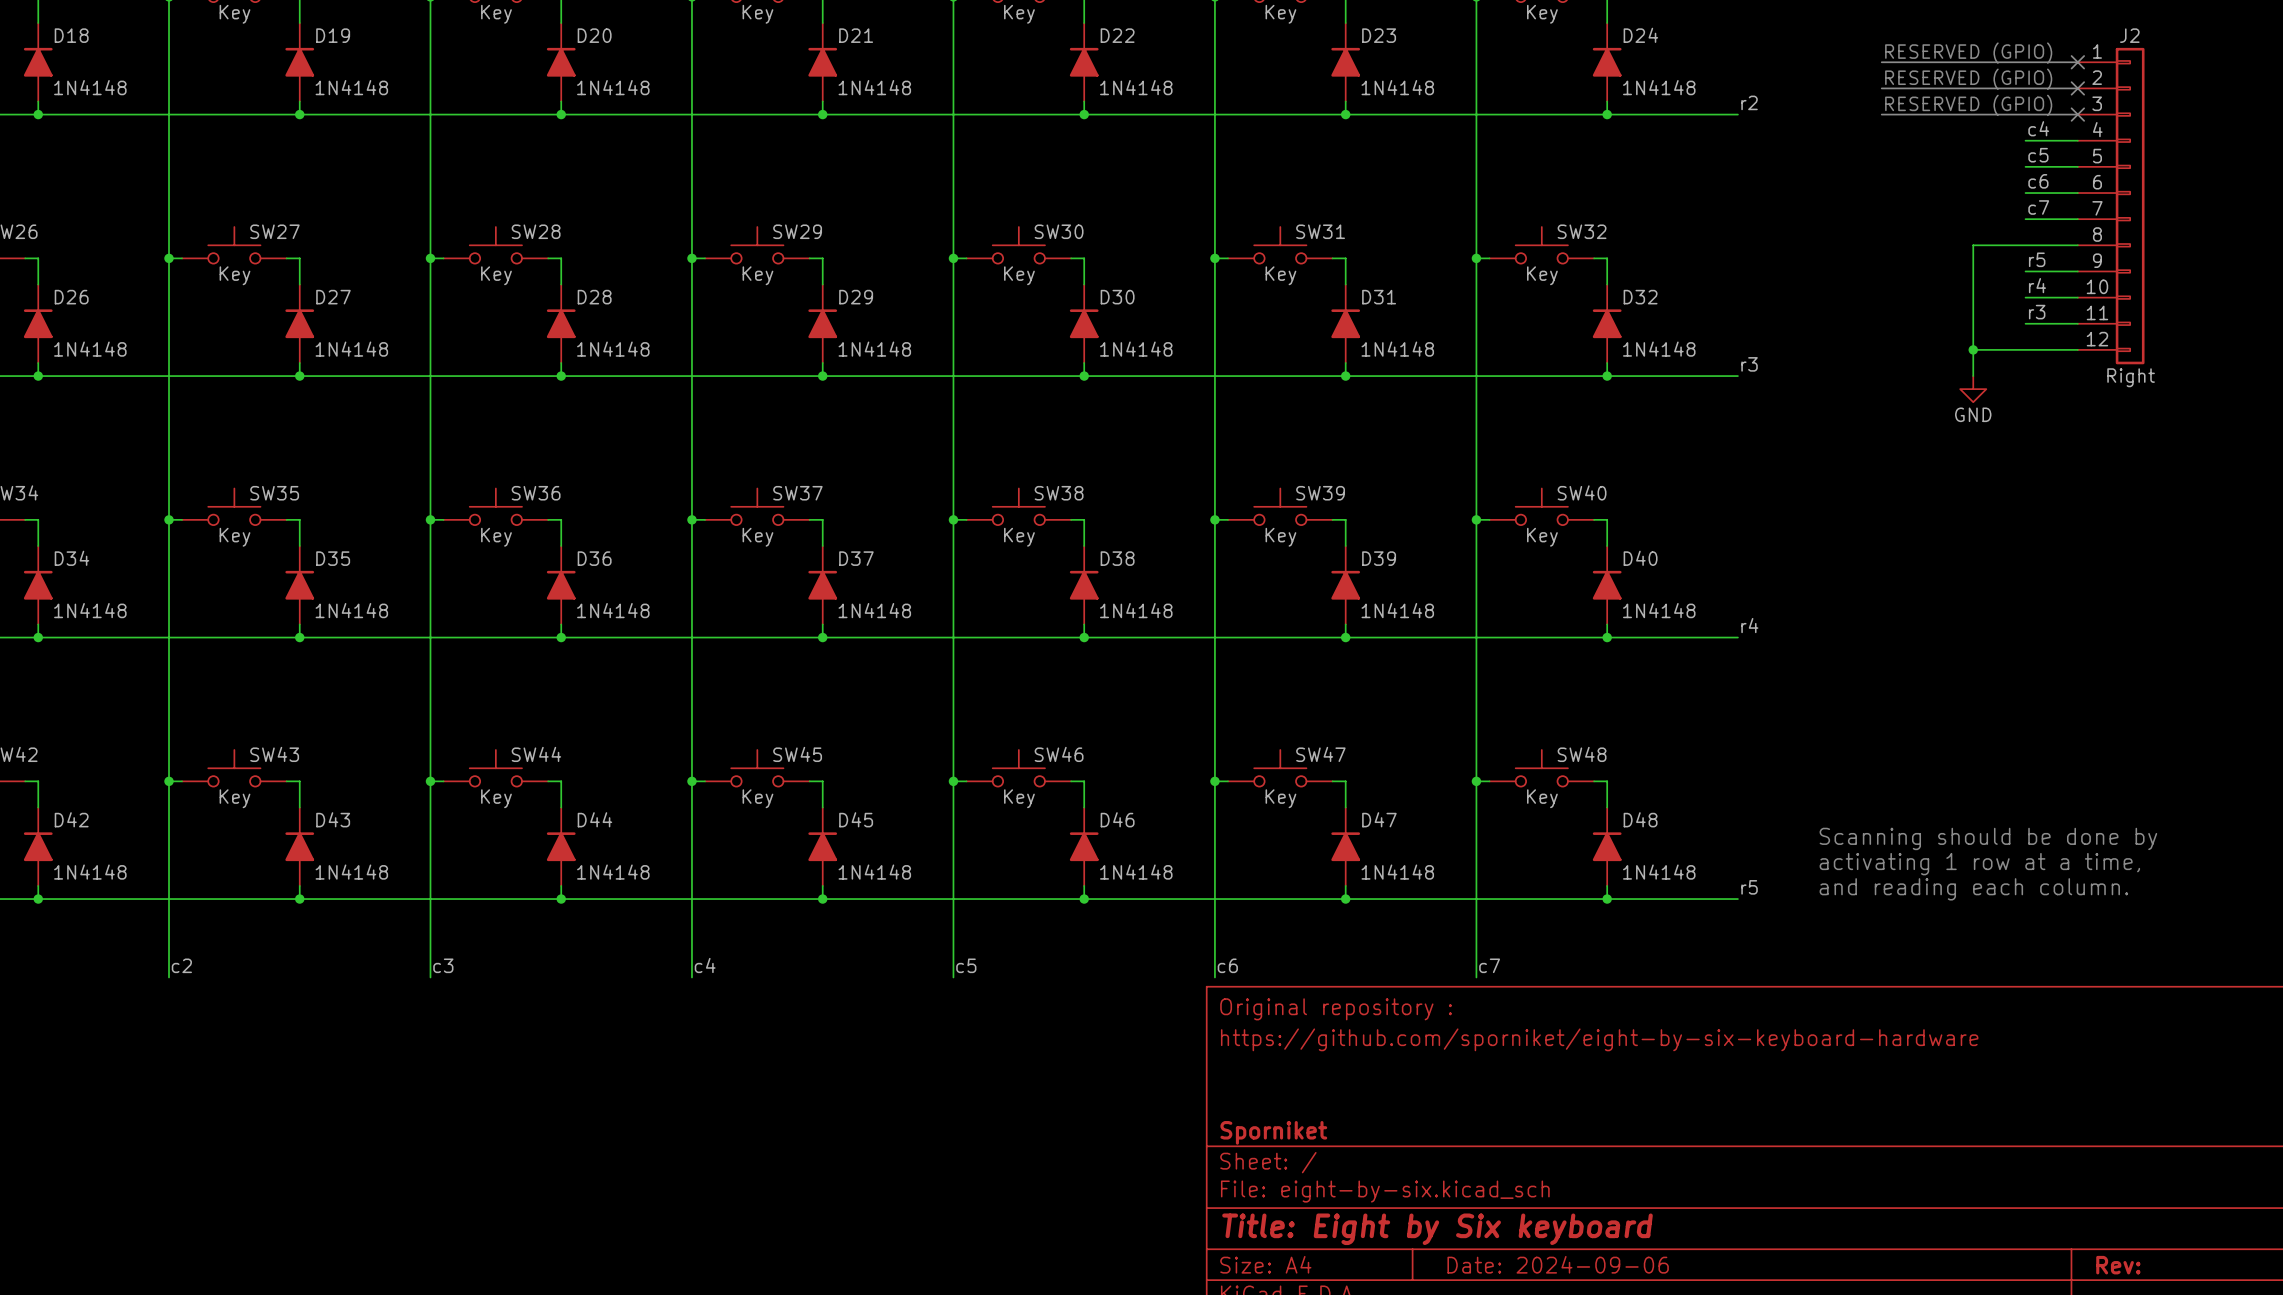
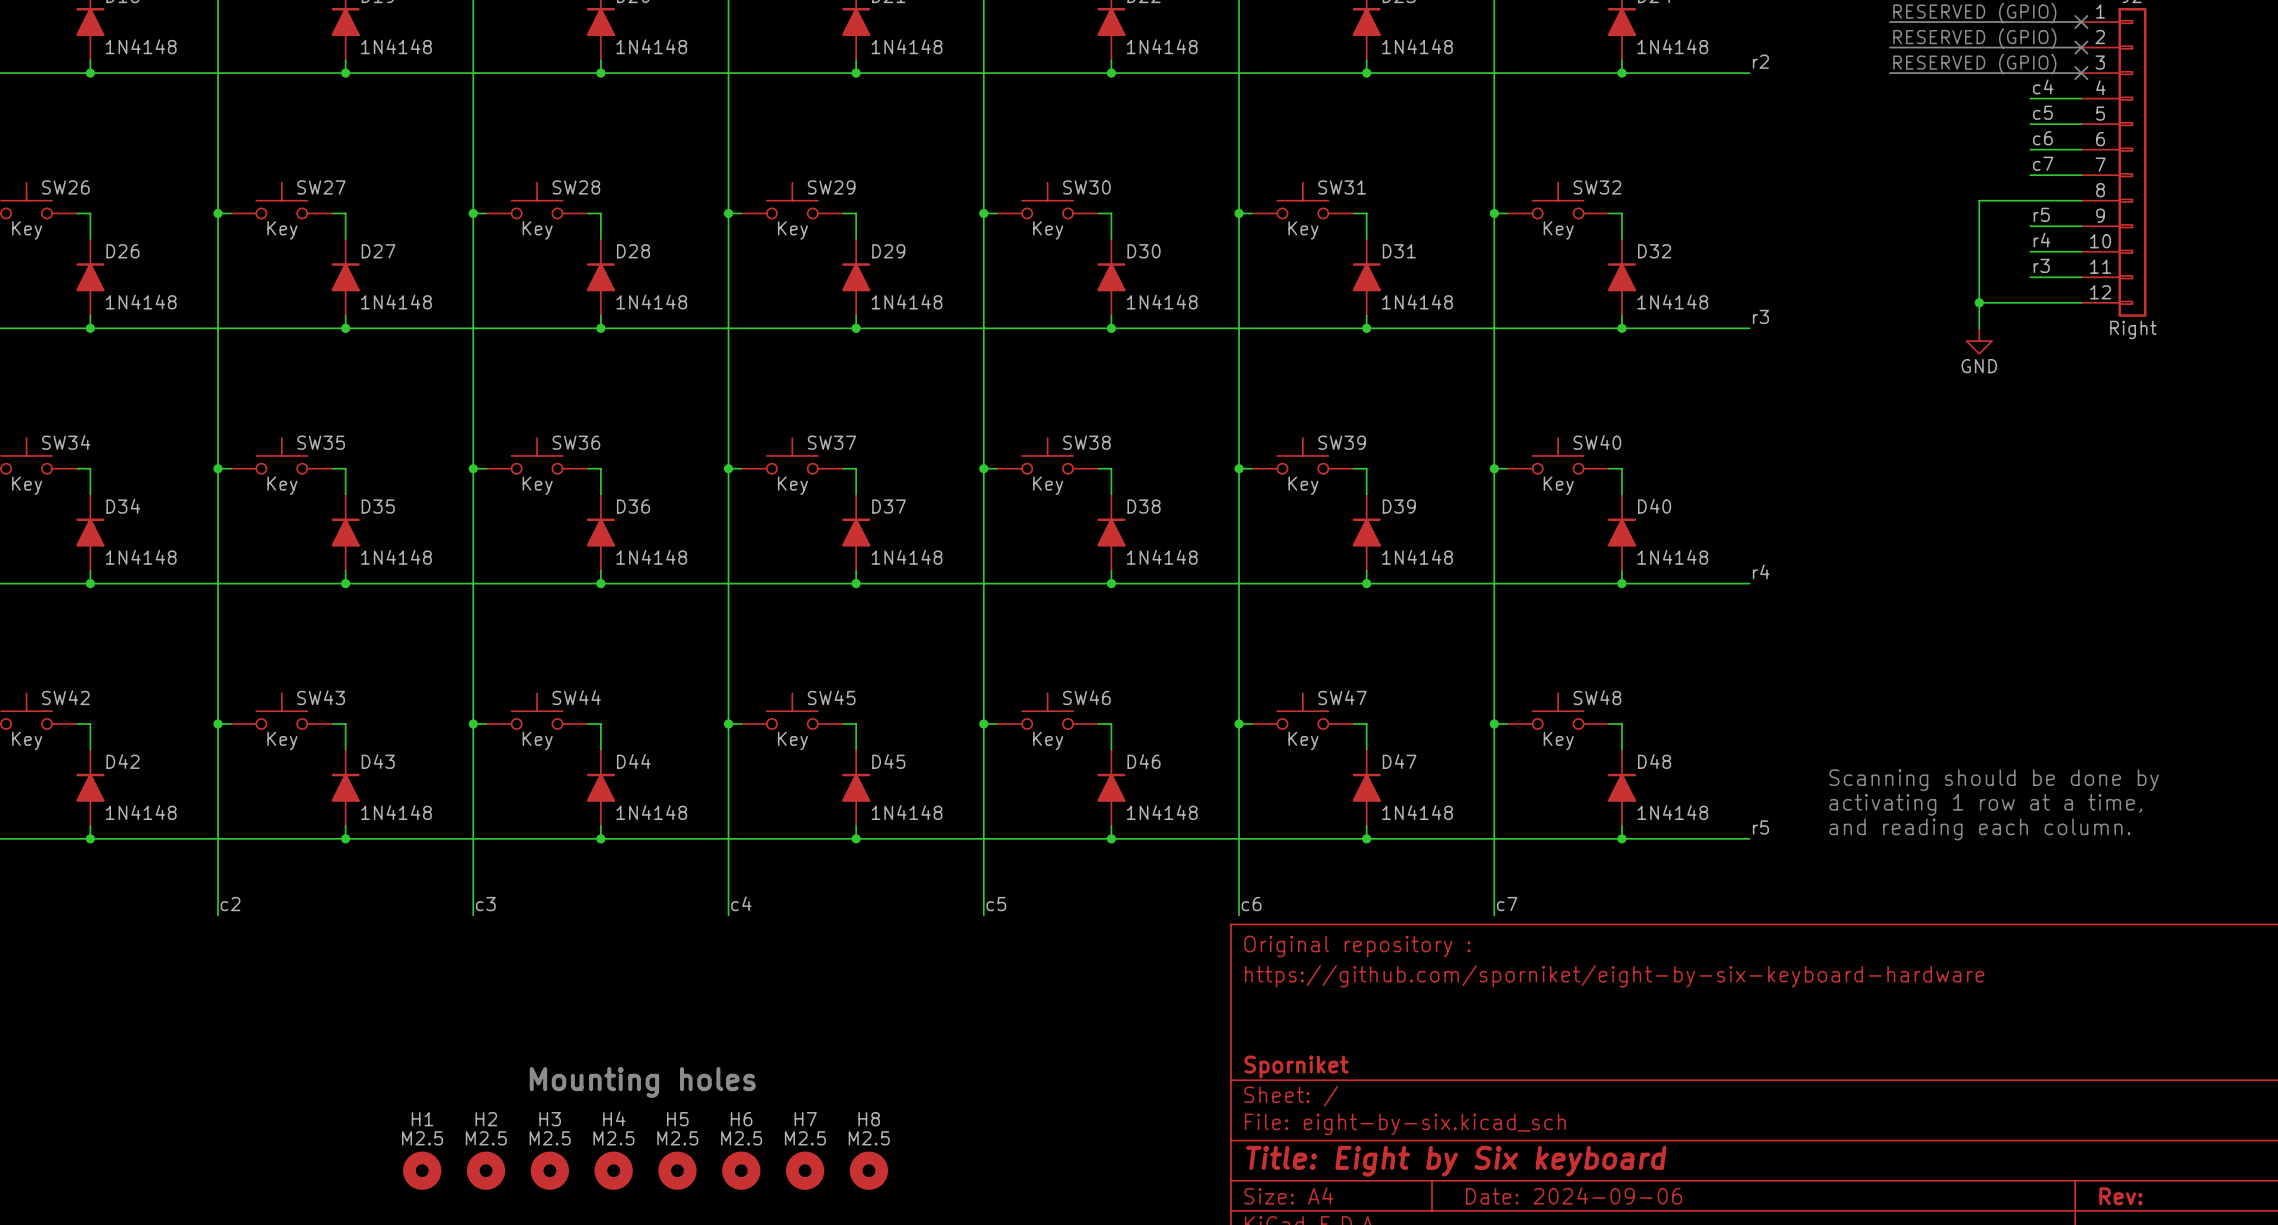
text: none -> Mounting holes (642, 1082)
H1: none -> M2.5 (422, 1170)
H2: none -> M2.5 (486, 1170)
H3: none -> M2.5 (549, 1170)
H4: none -> M2.5 (613, 1170)
H5: none -> M2.5 (677, 1170)
H6: none -> M2.5 (741, 1170)
H7: none -> M2.5 (805, 1170)
H8: none -> M2.5 (868, 1170)

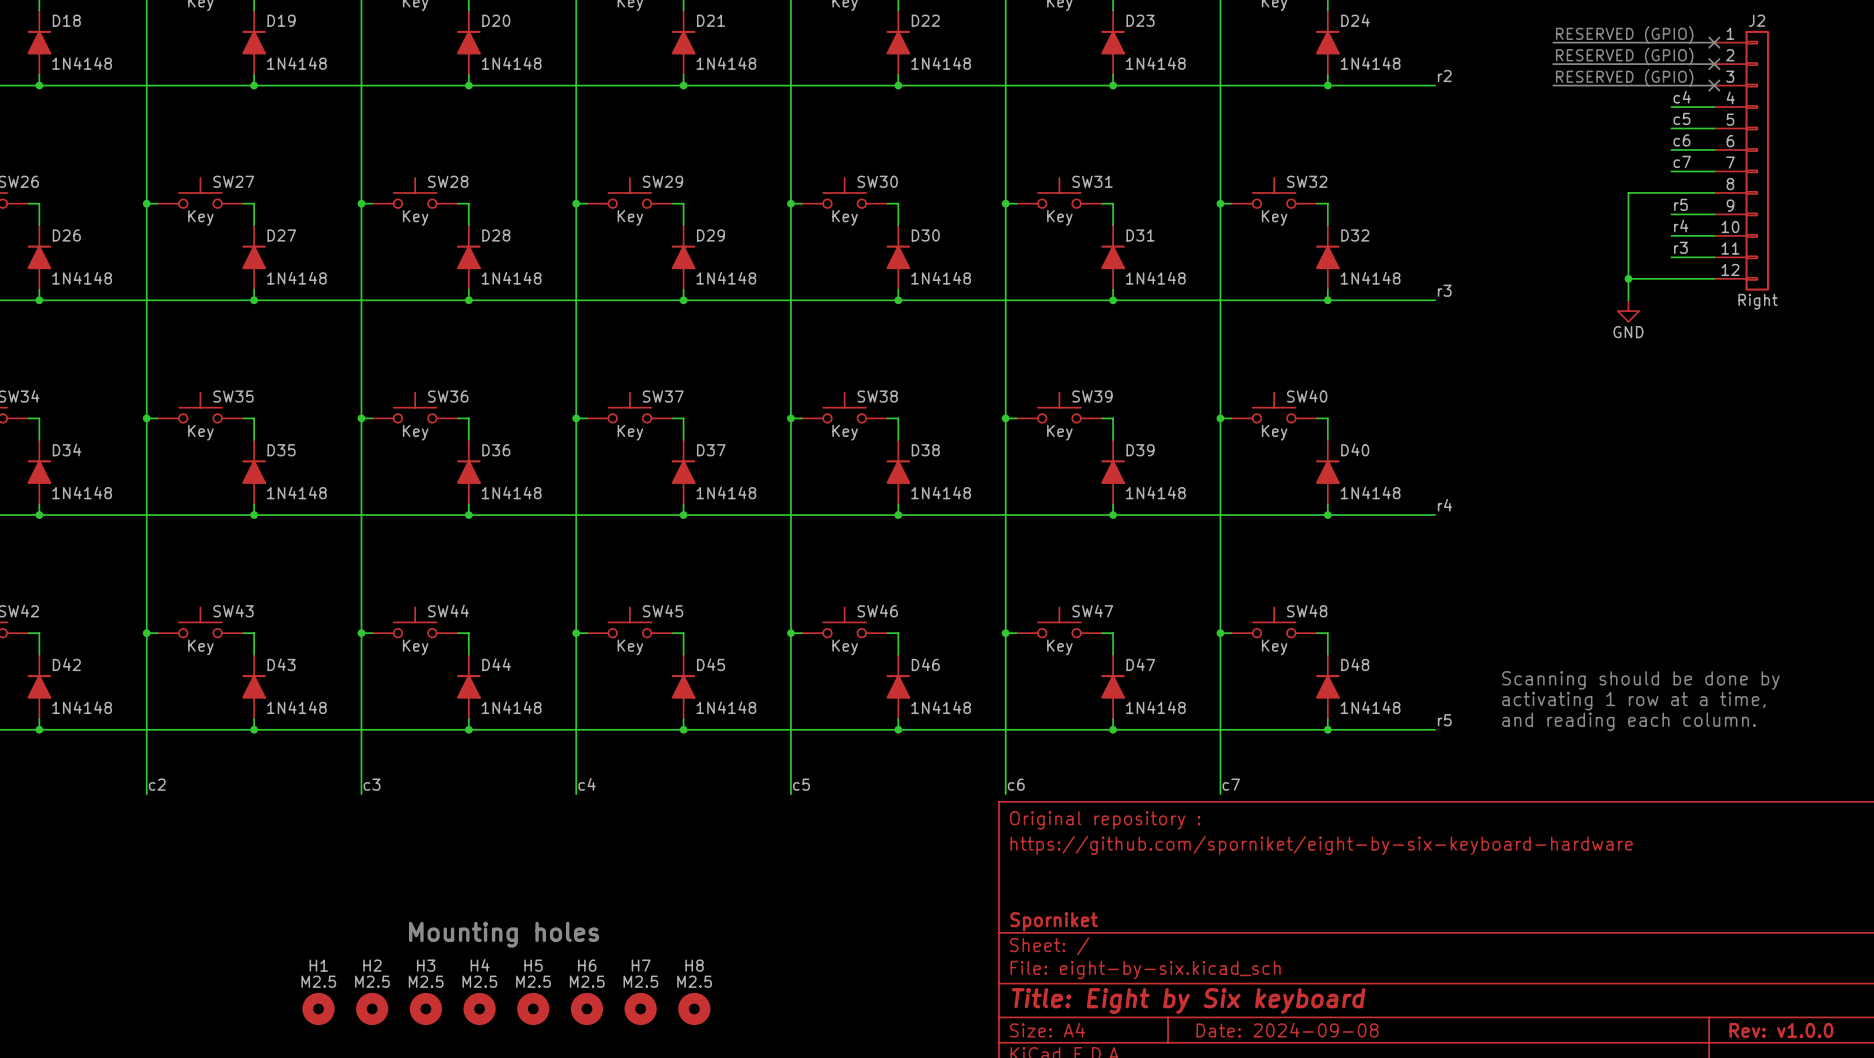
title block: Date: 2024-09-06 (1574, 1195) -> Date: 2024-09-08 (1287, 1030)
title block: Rev: (2120, 1196) -> Rev: v1.0.0 (1781, 1030)

